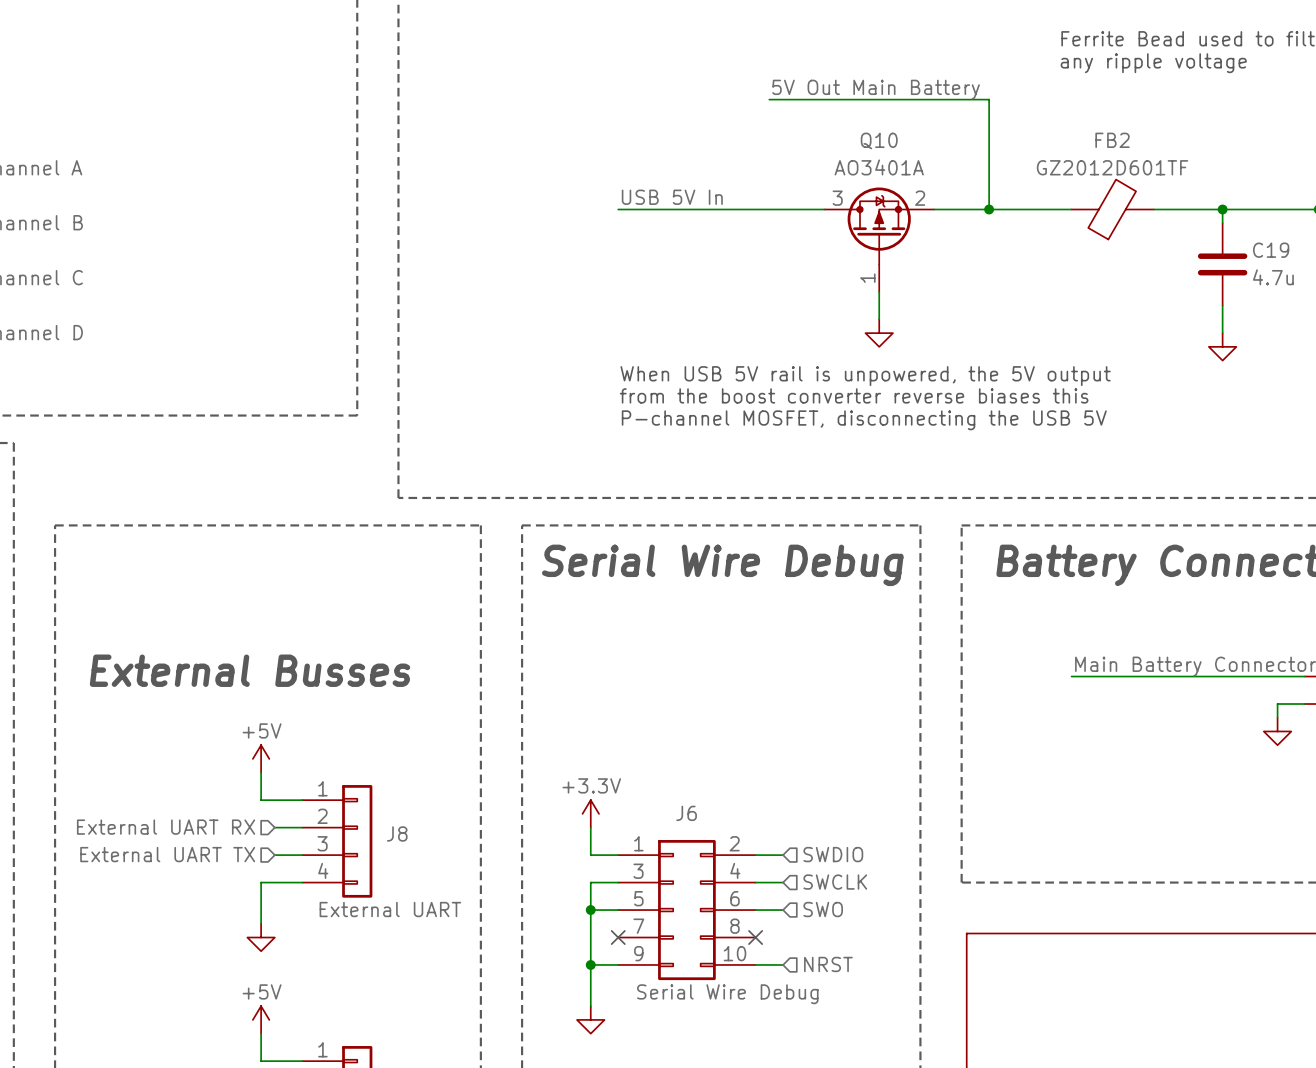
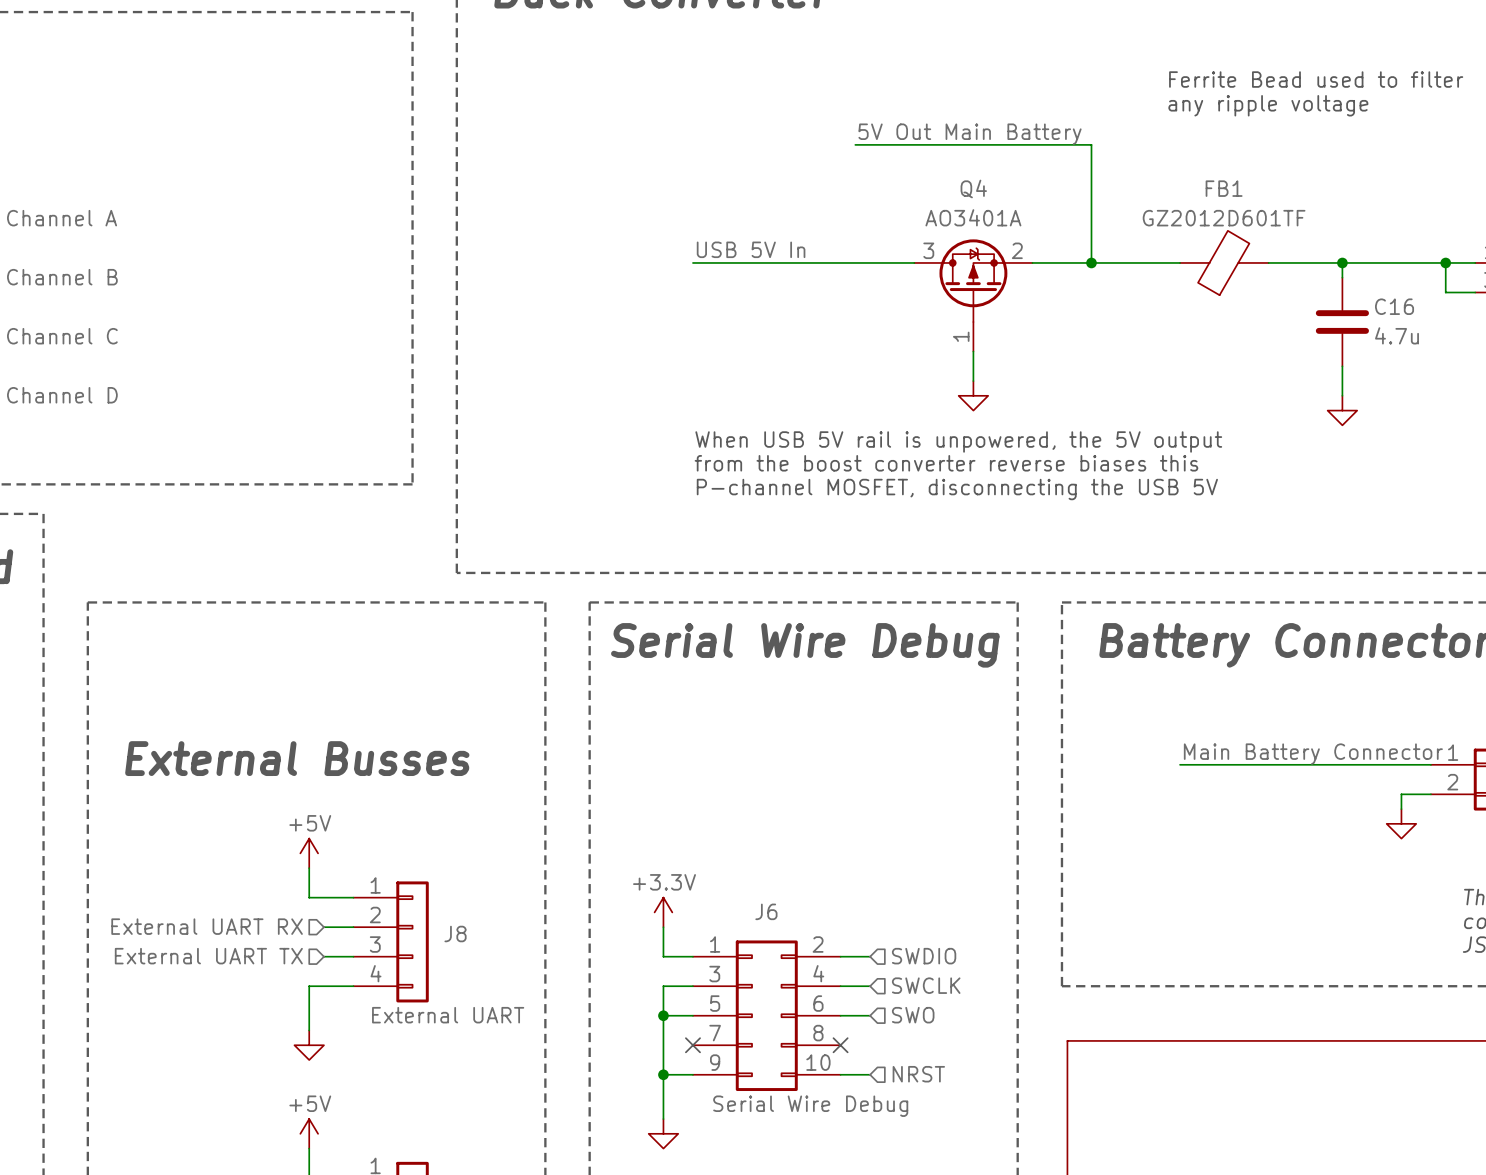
Q10 name: Q10 (879, 140) -> Q4 (973, 188)
FB2 name: FB2 (1112, 140) -> FB1 (1224, 188)
C19 name: C19 (1271, 250) -> C16 (1394, 306)

